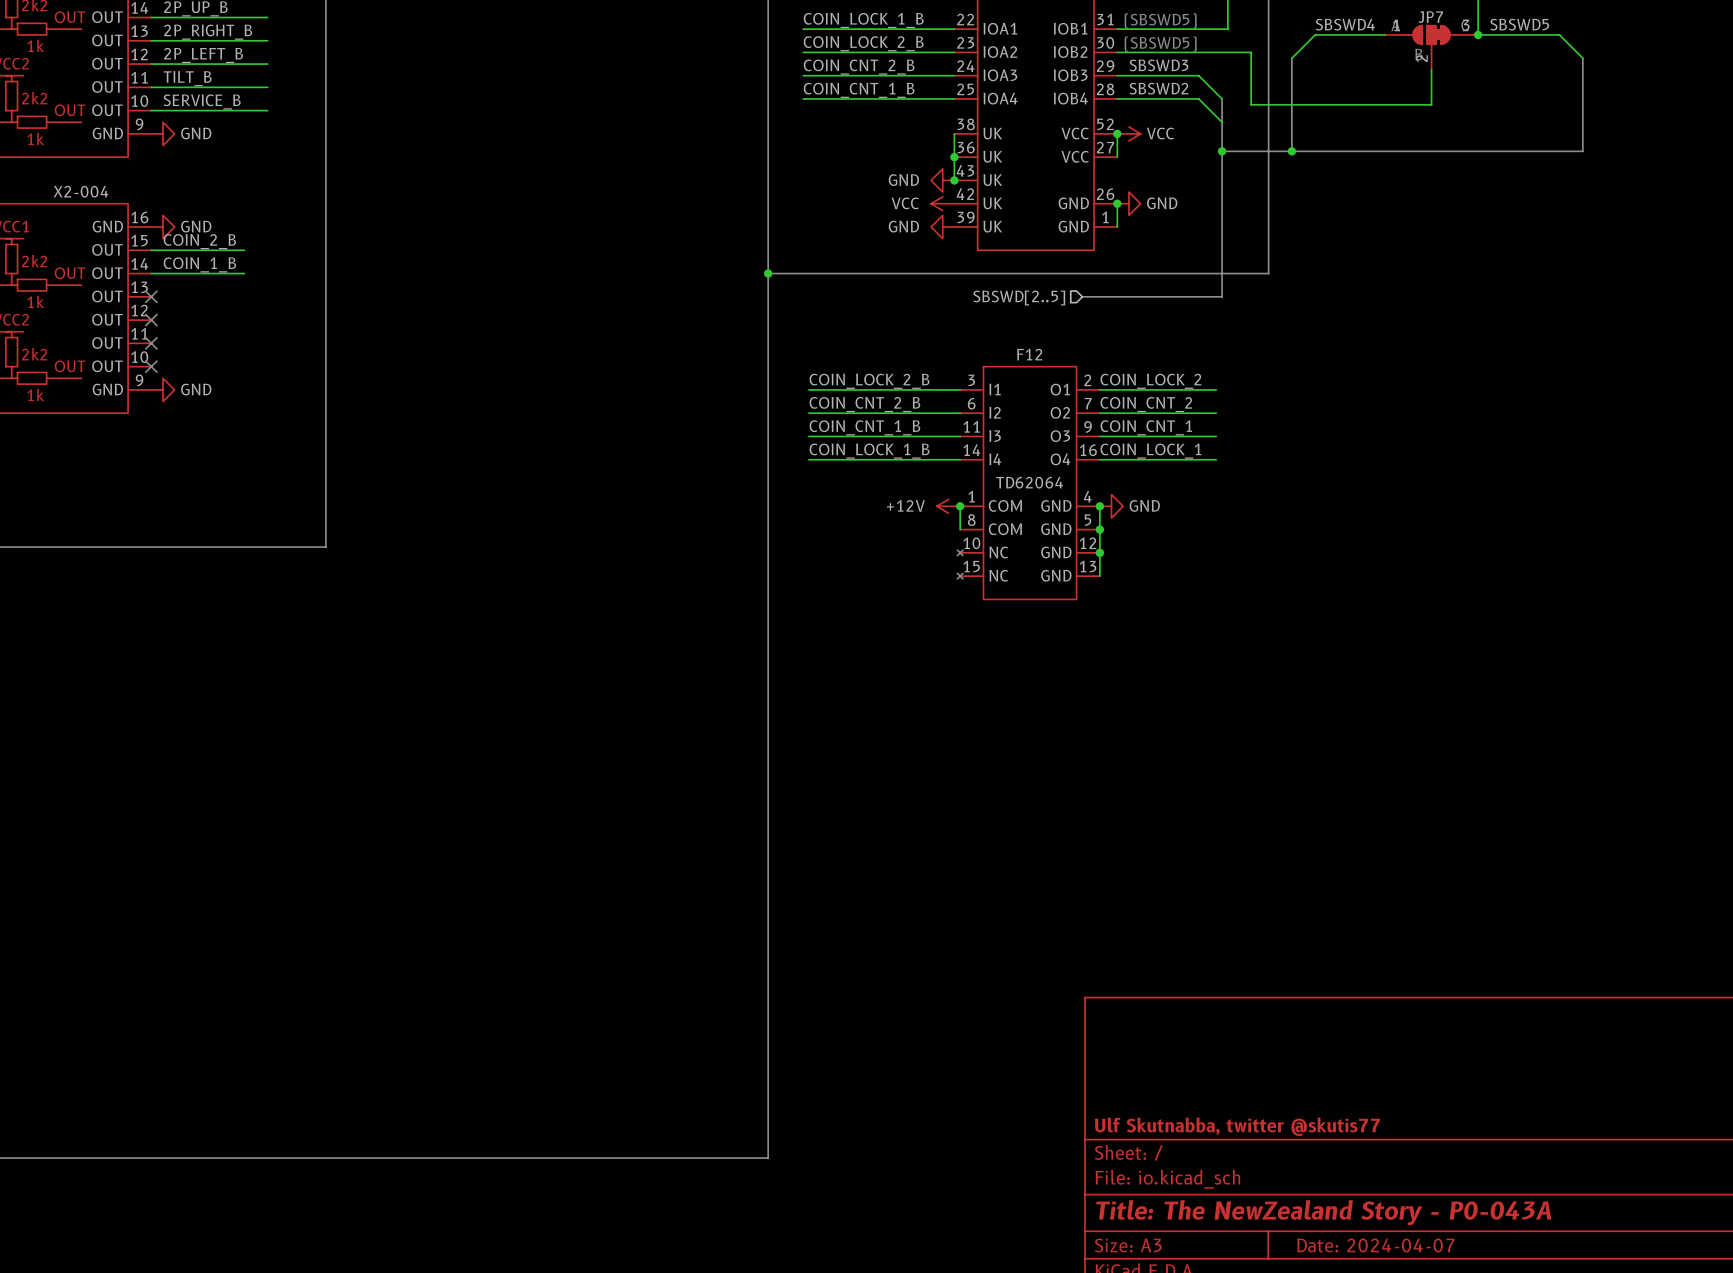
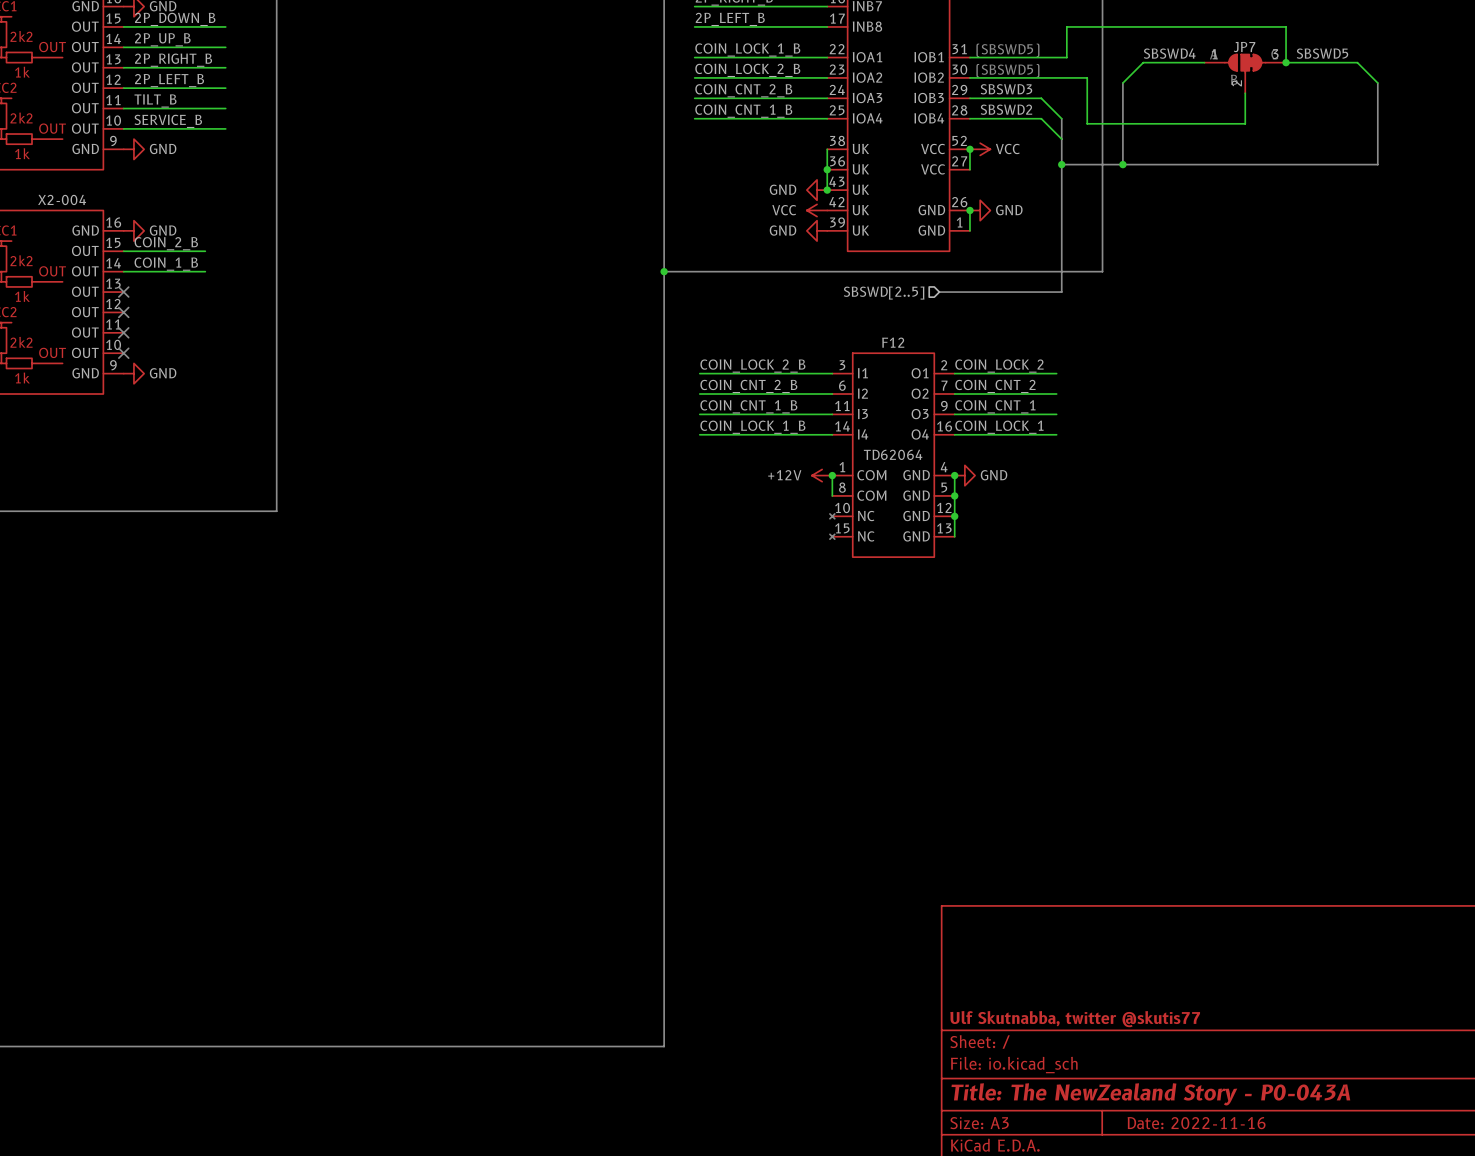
title block: Date: 2024-04-07 (1375, 1245) -> Date: 2022-11-16 (1196, 1123)

